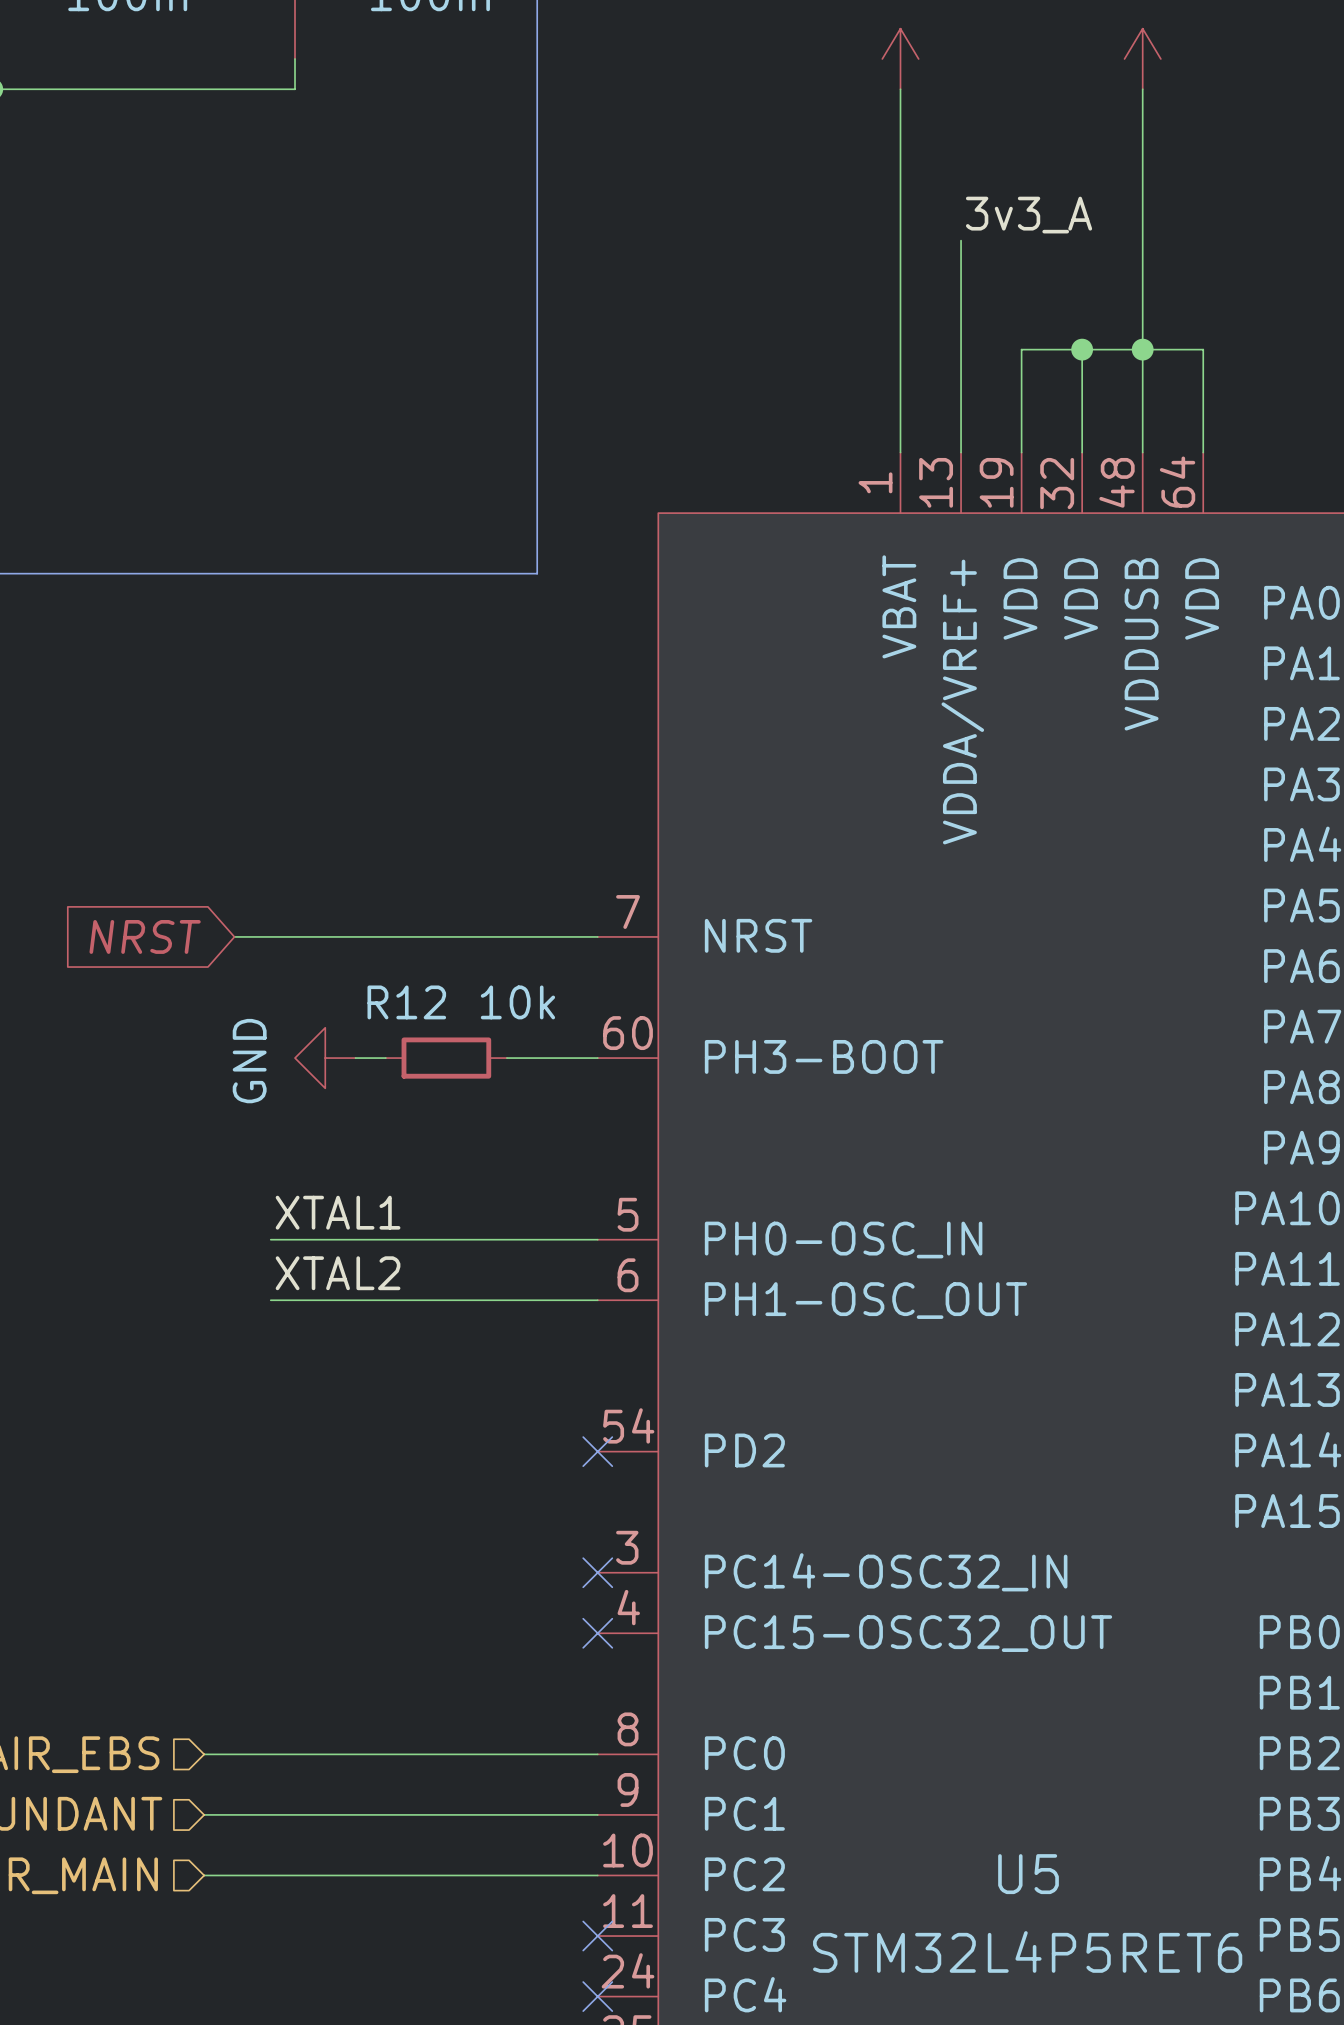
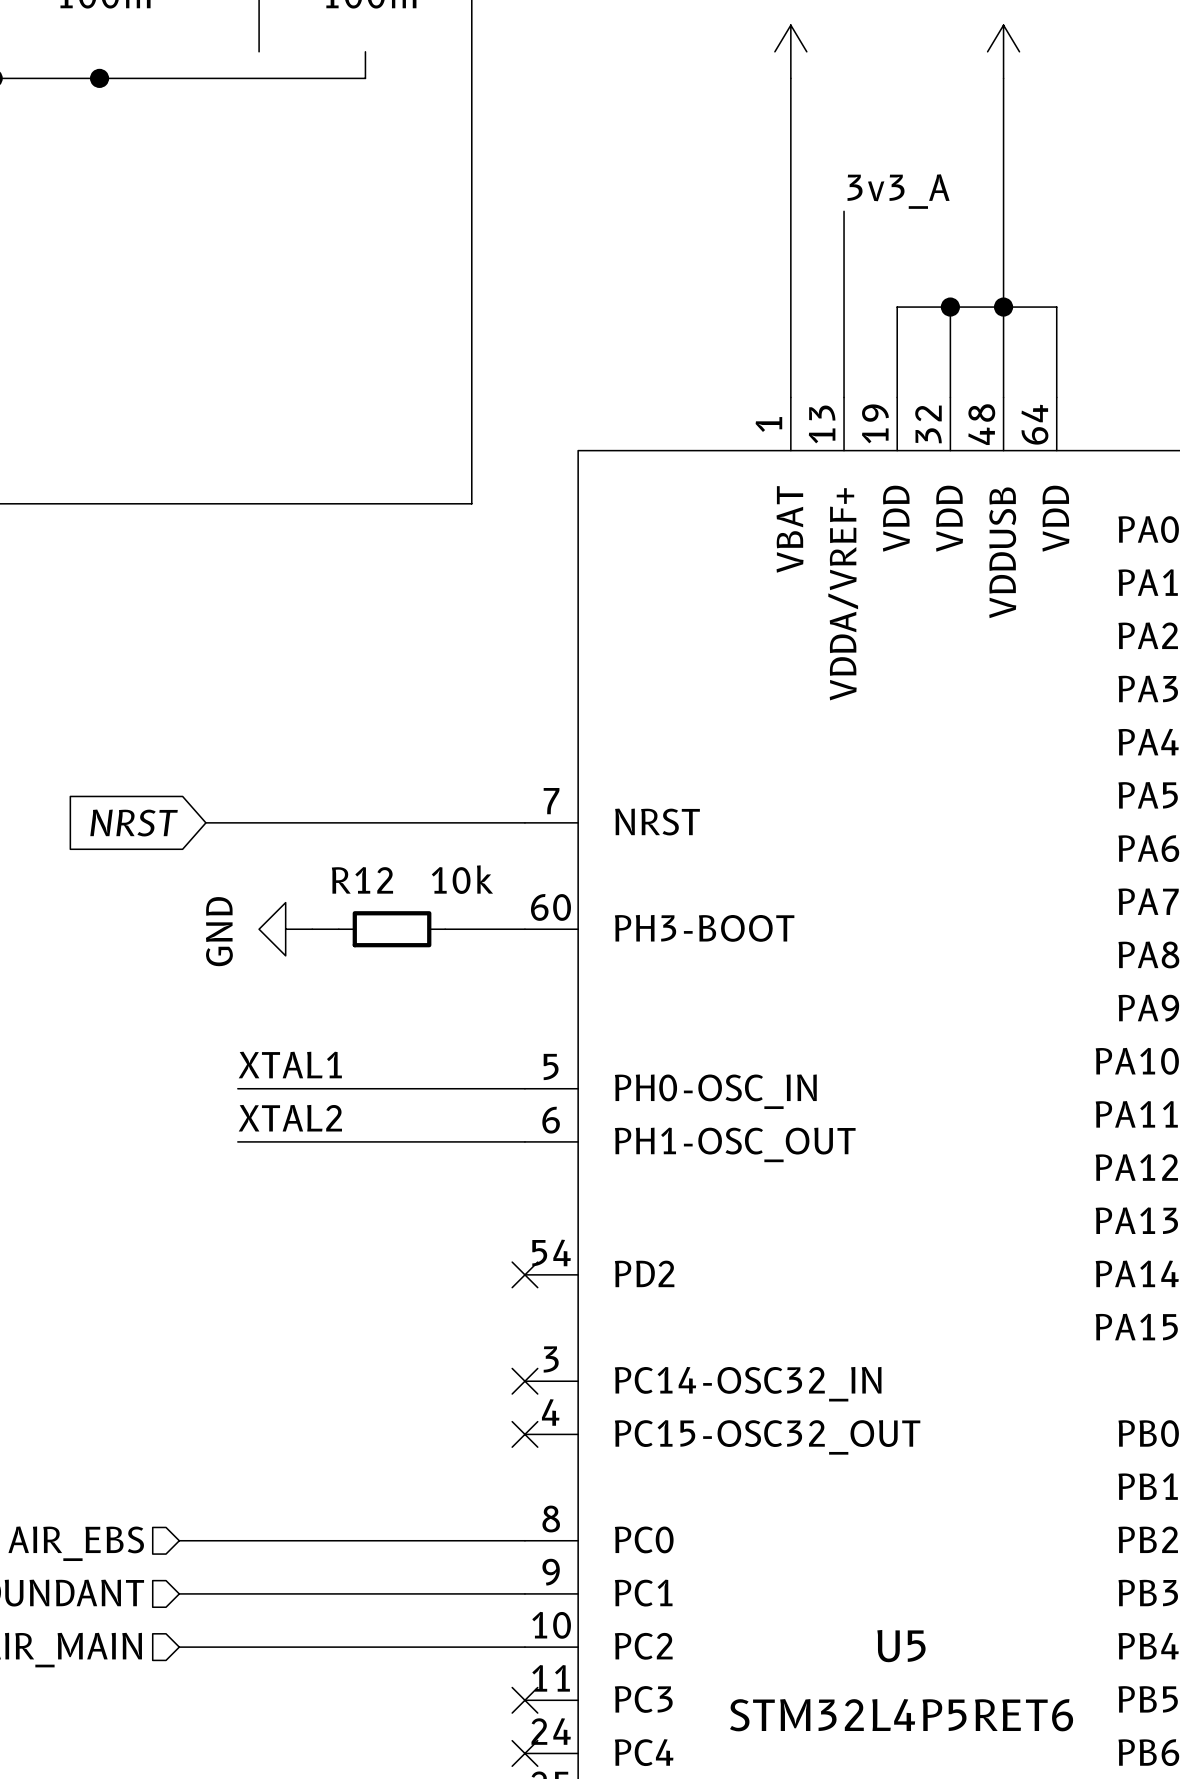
wire: (295, 58) (295, 89) -> (365, 51) (365, 78) (259, 78)
junction: none -> (99, 78)

